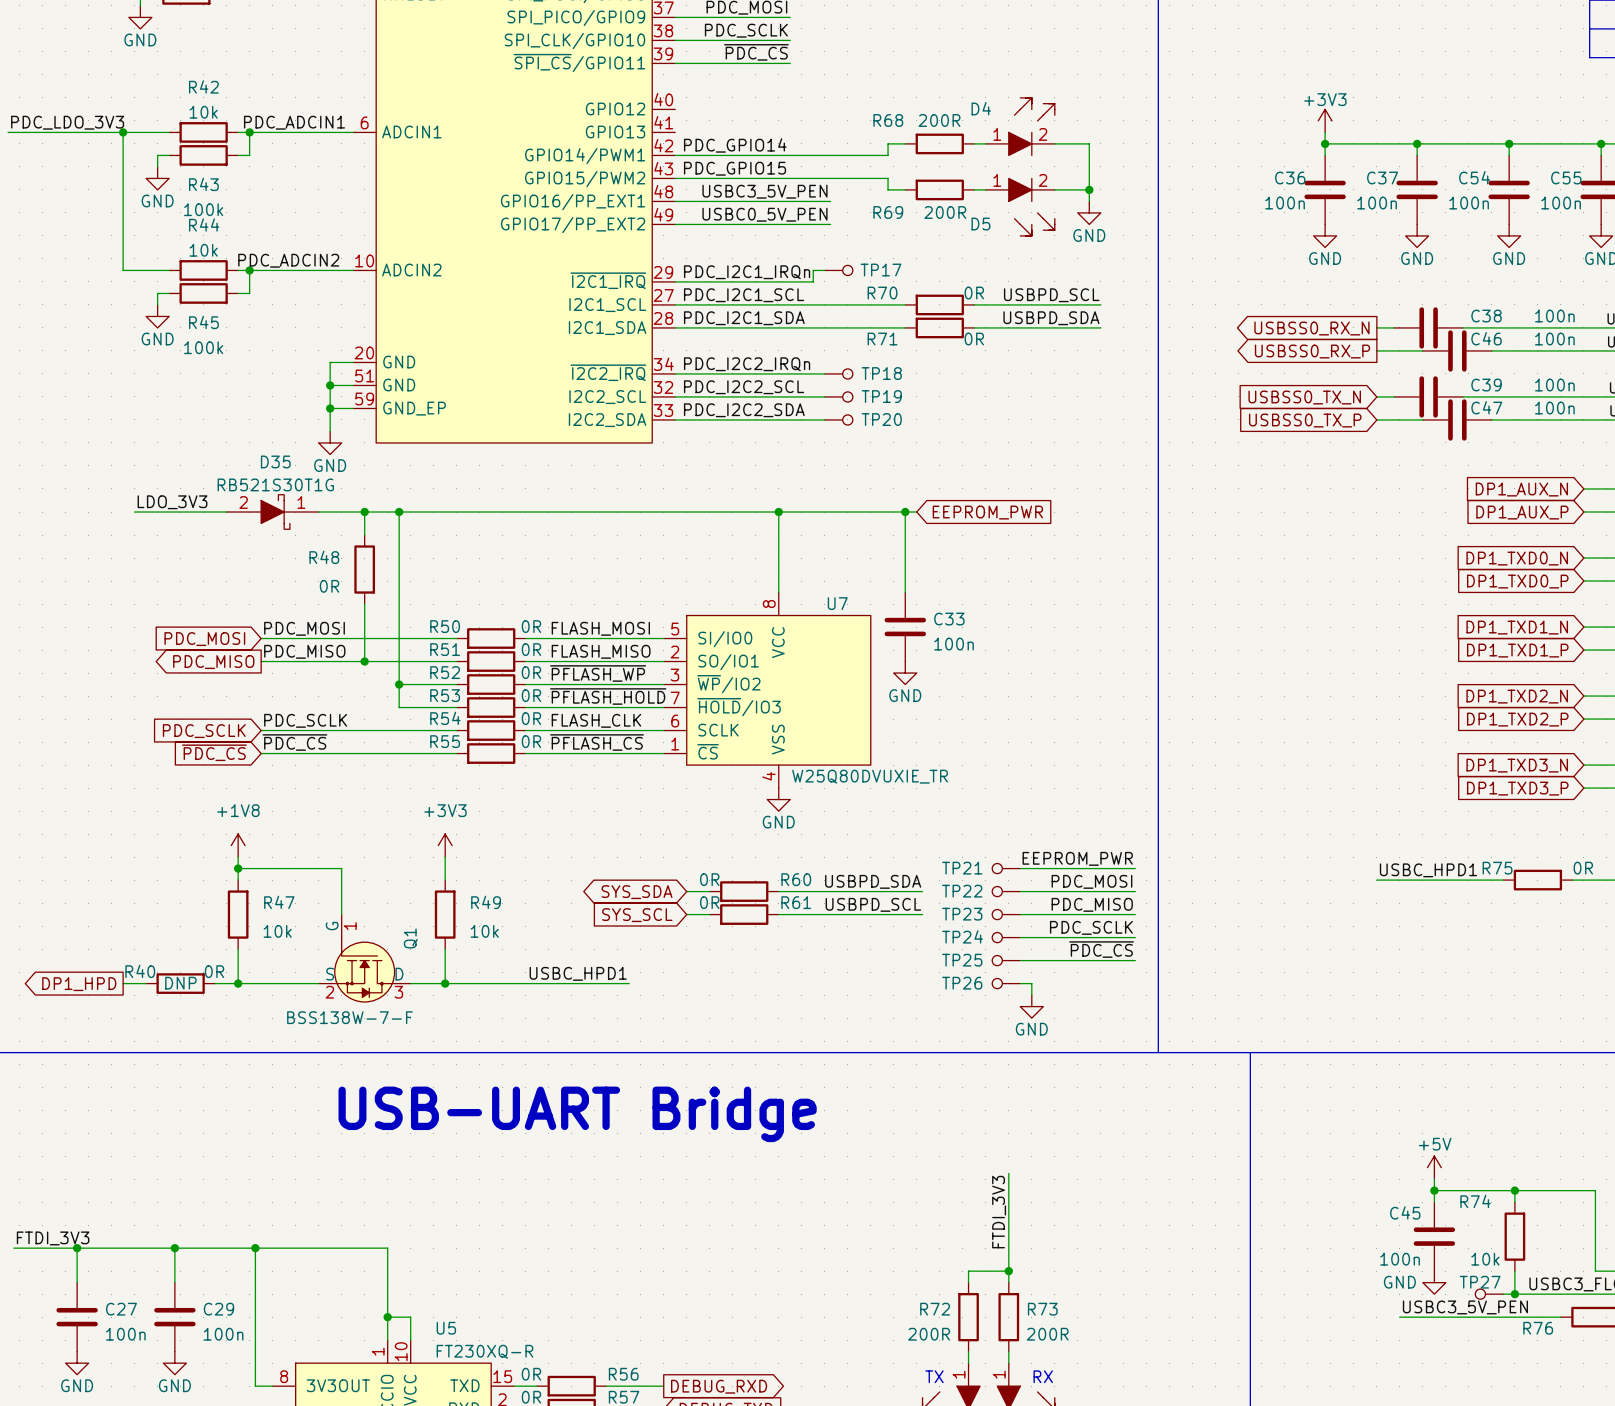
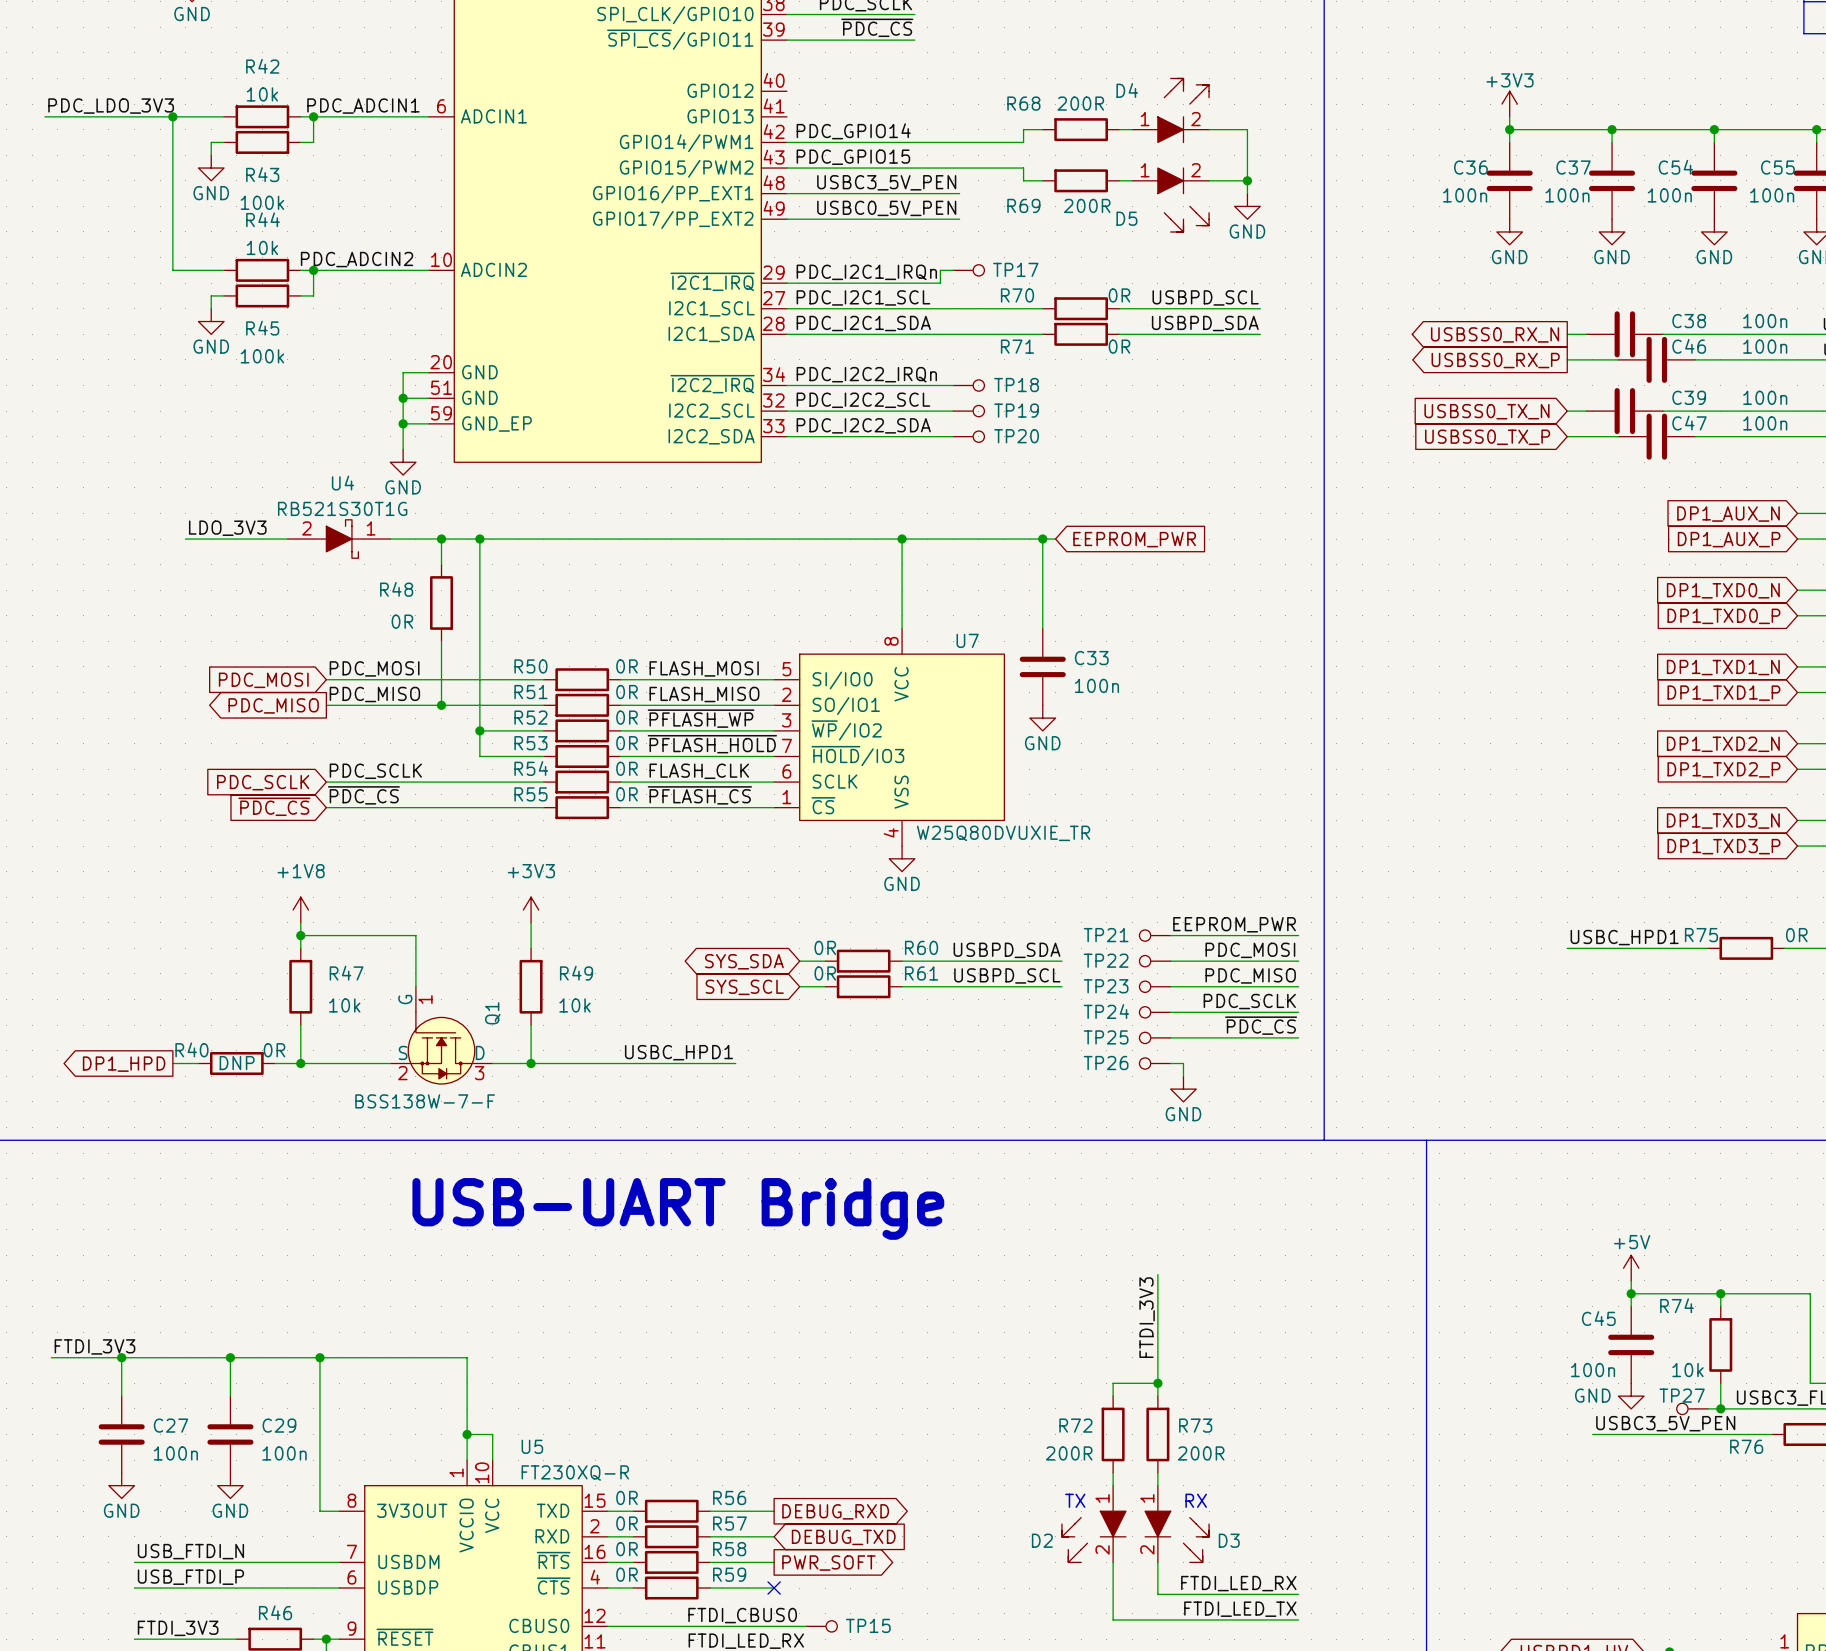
D35 name: D35 (275, 461) -> U4 (342, 483)

